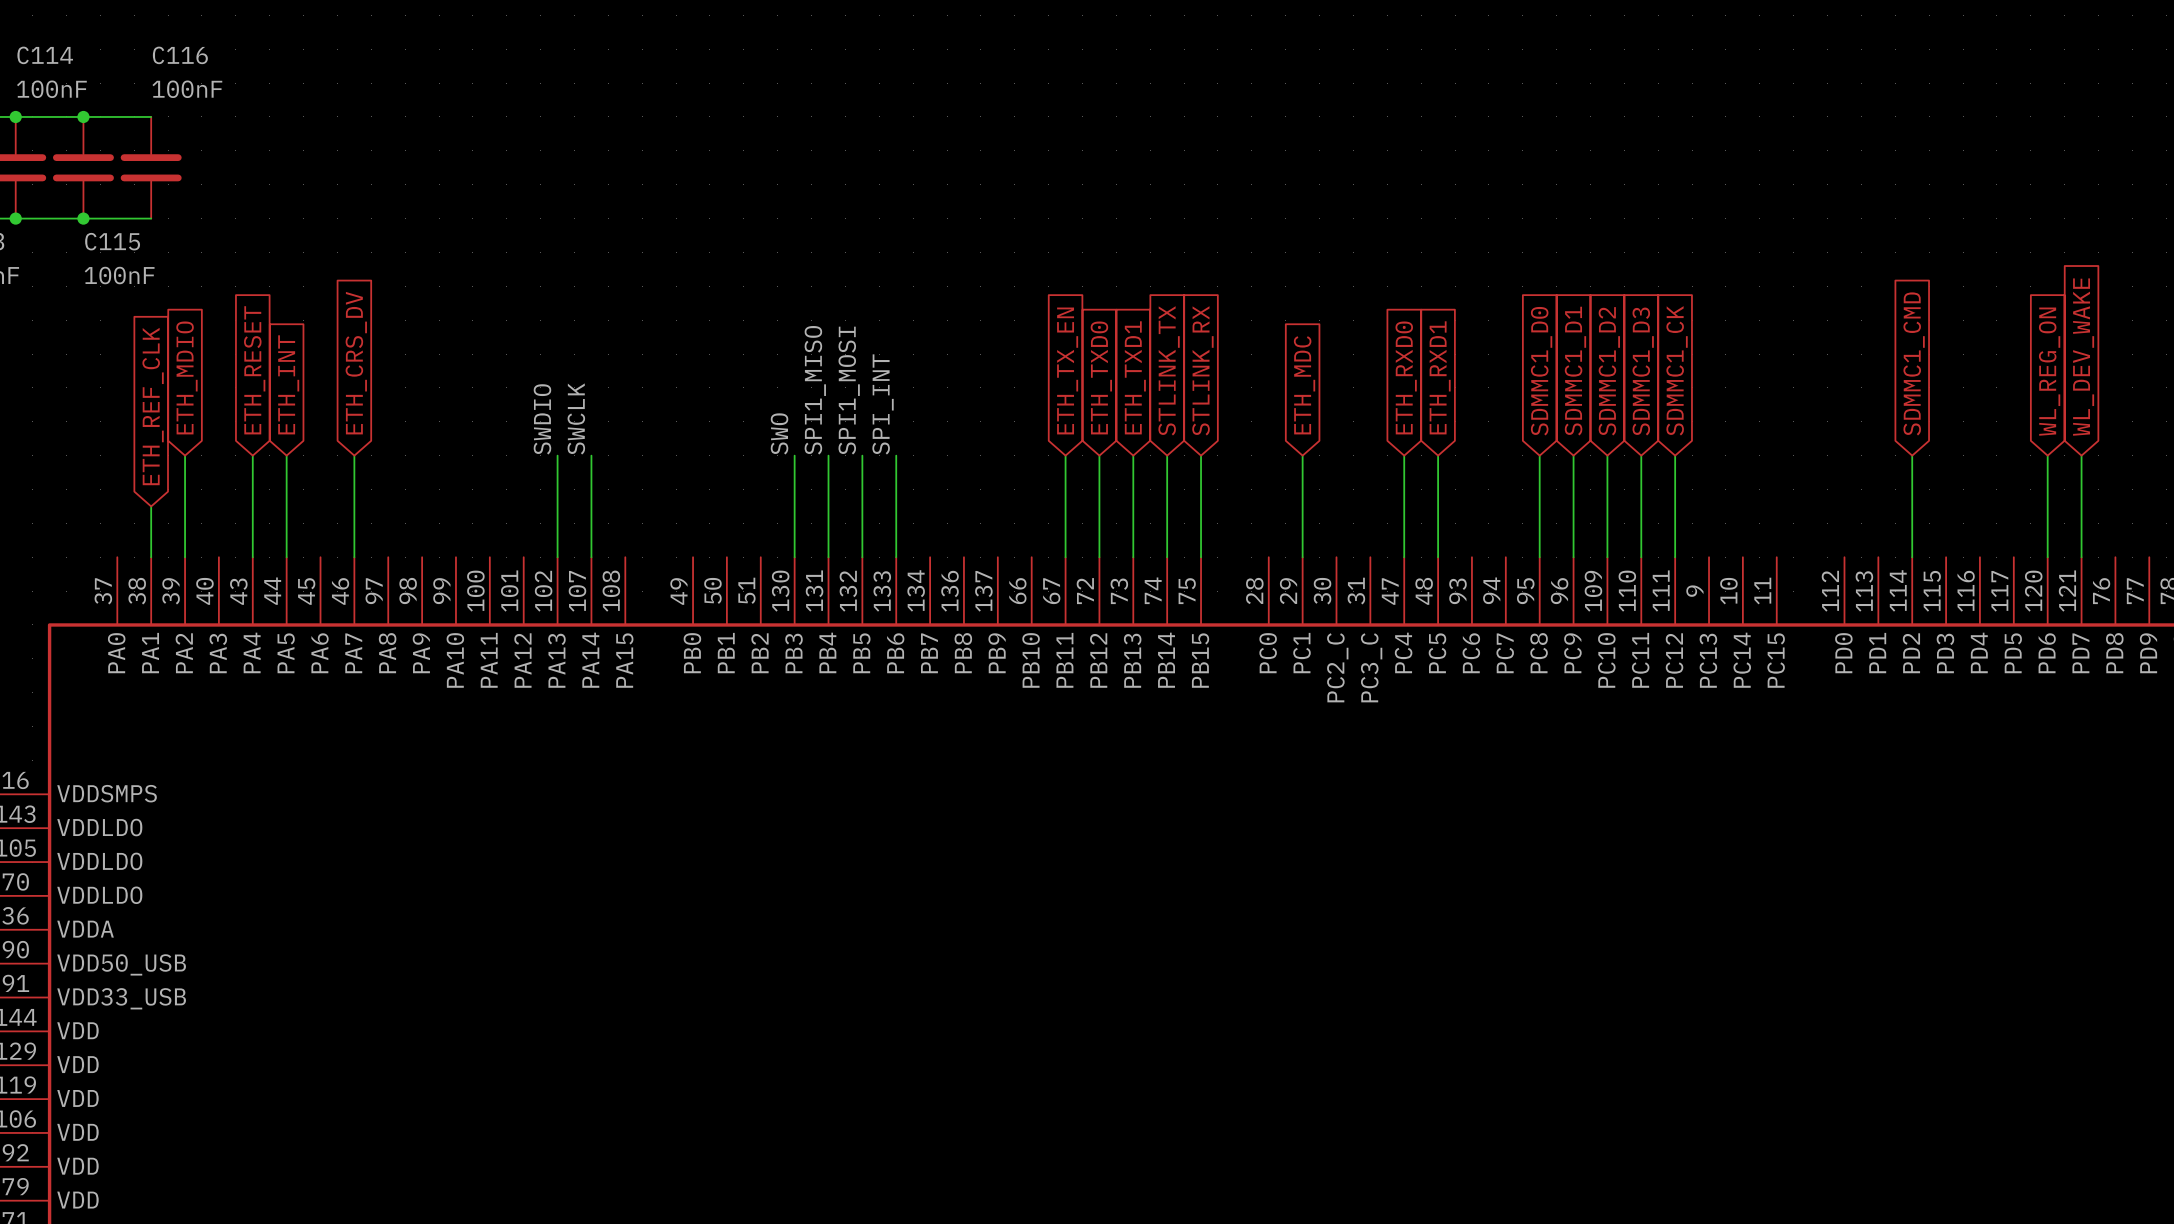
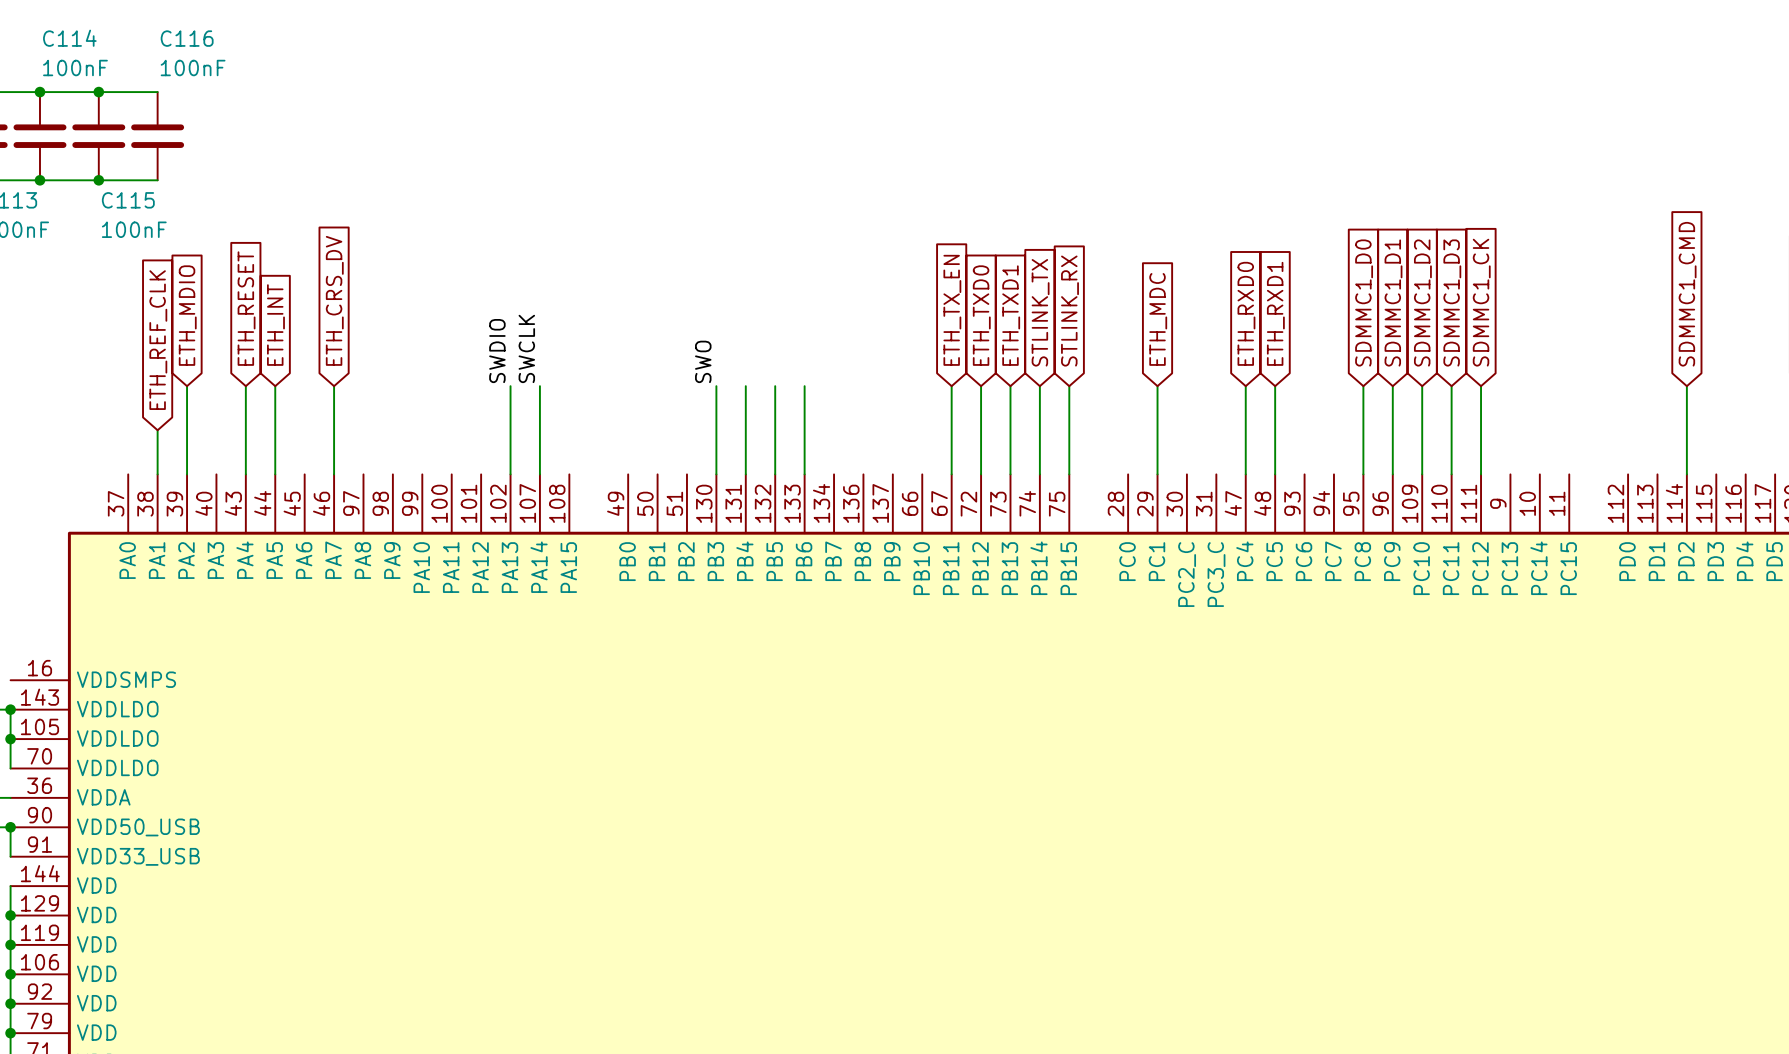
label: SPI1_MISO (815, 390) -> none
label: SPI1_MOSI (849, 390) -> none
label: SPI_INT (883, 404) -> none

